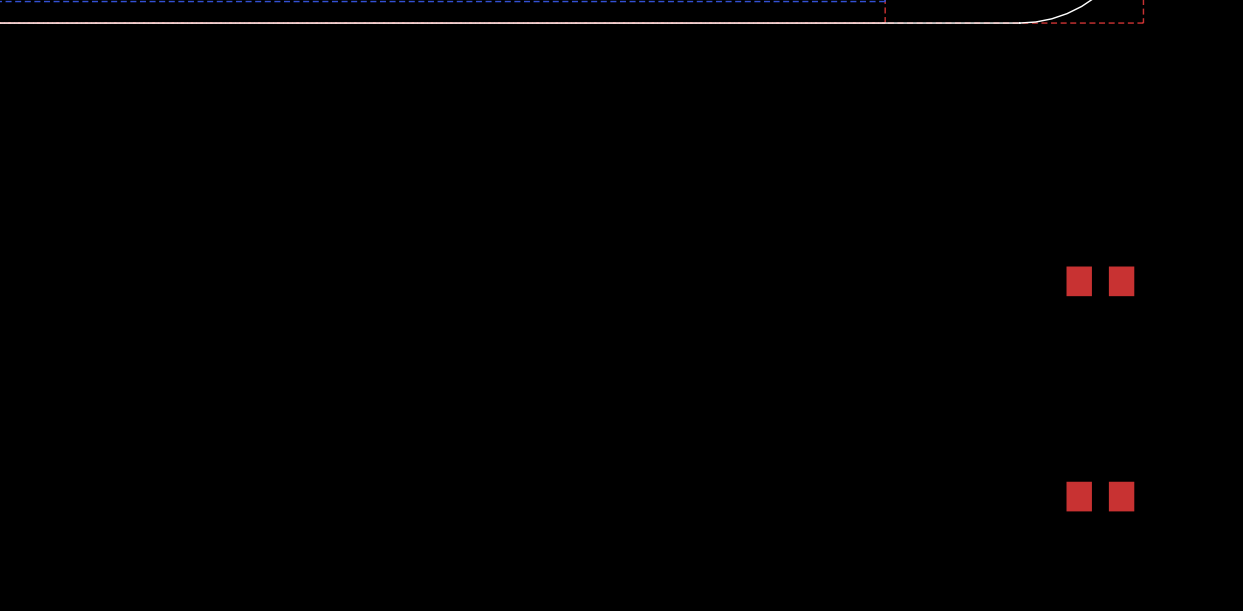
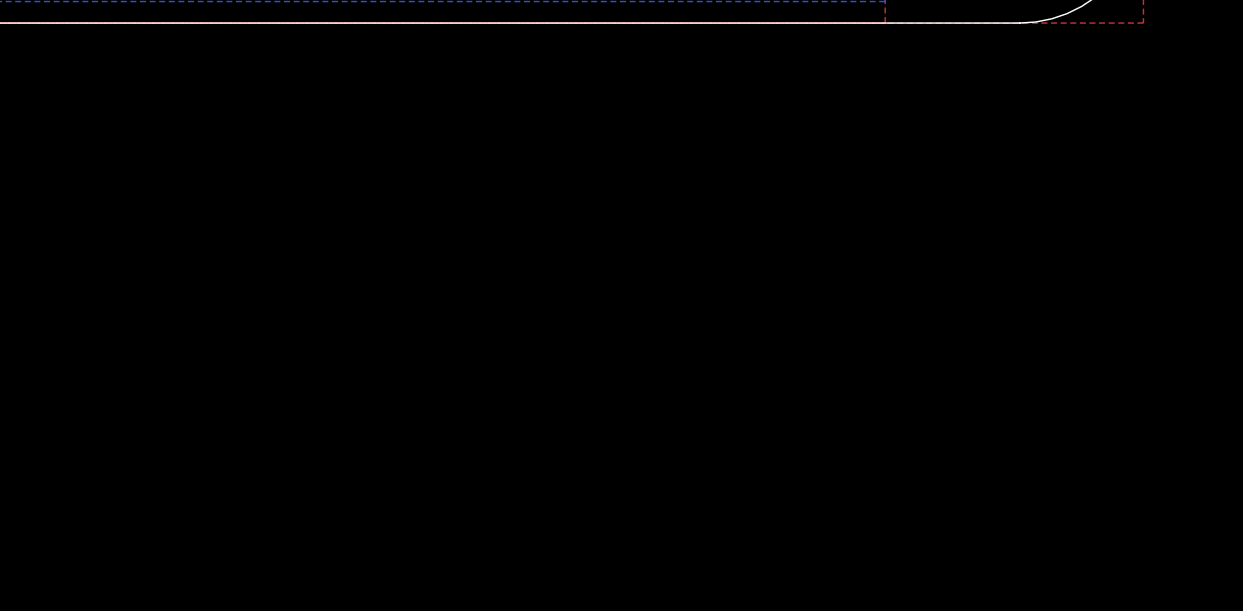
part: (1100, 281) -> none
part: (1100, 496) -> none

